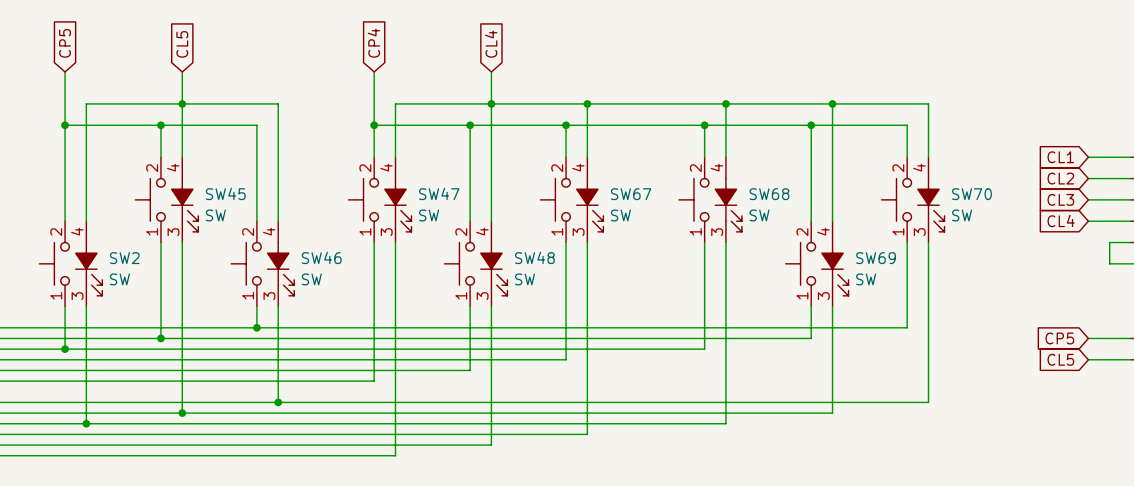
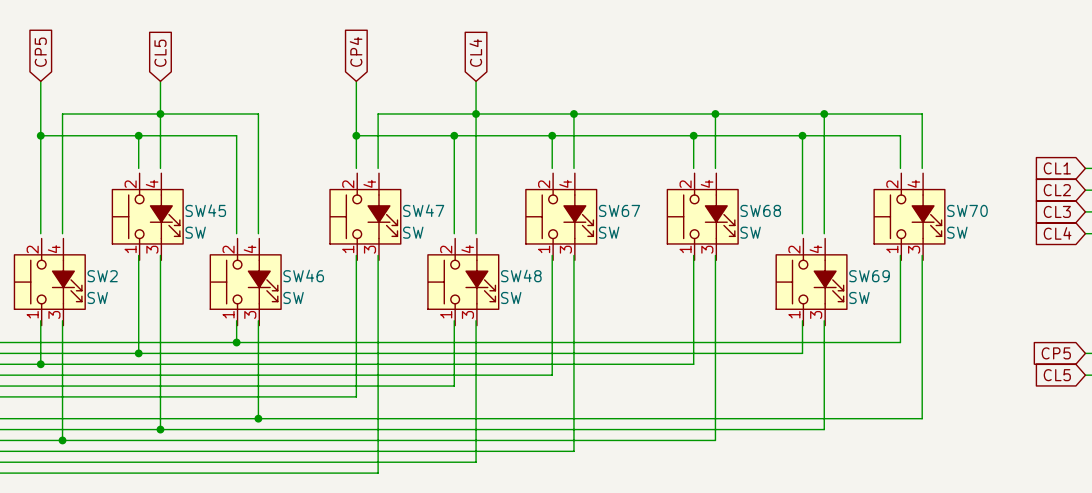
SW45 symbol: [135, 157, 199, 243] -> [112, 173, 184, 261]
SW47 symbol: [348, 157, 412, 243] -> [330, 173, 401, 261]
SW67 symbol: [540, 157, 604, 243] -> [525, 173, 597, 261]
SW68 symbol: [679, 157, 742, 243] -> [667, 173, 739, 261]
SW70 symbol: [881, 157, 945, 243] -> [874, 173, 945, 261]
SW2 symbol: [39, 221, 103, 307] -> [14, 238, 86, 326]
SW46 symbol: [231, 221, 295, 307] -> [210, 238, 282, 326]
SW48 symbol: [444, 221, 508, 307] -> [427, 238, 499, 326]
SW69 symbol: [785, 221, 849, 307] -> [776, 238, 847, 326]

